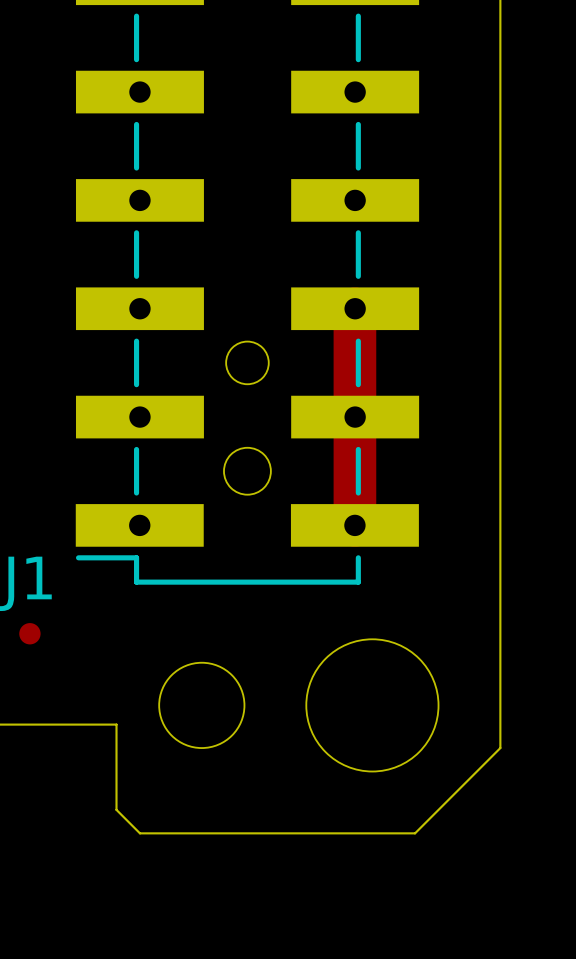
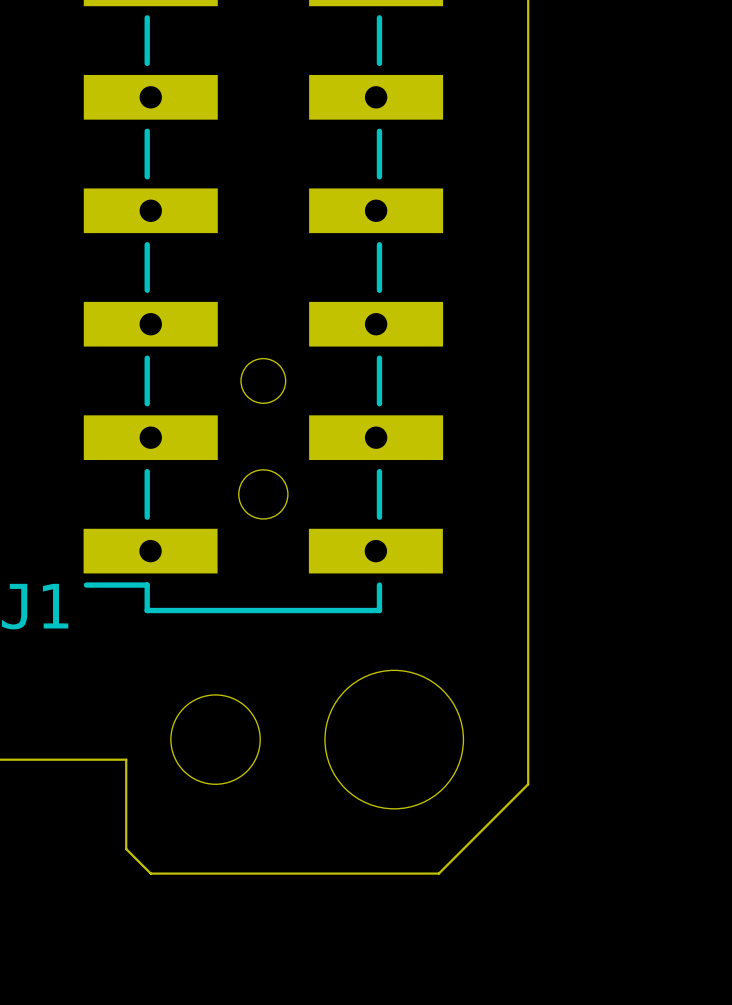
track: (354, 308) (354, 525) -> none
part: (29, 633) -> none

